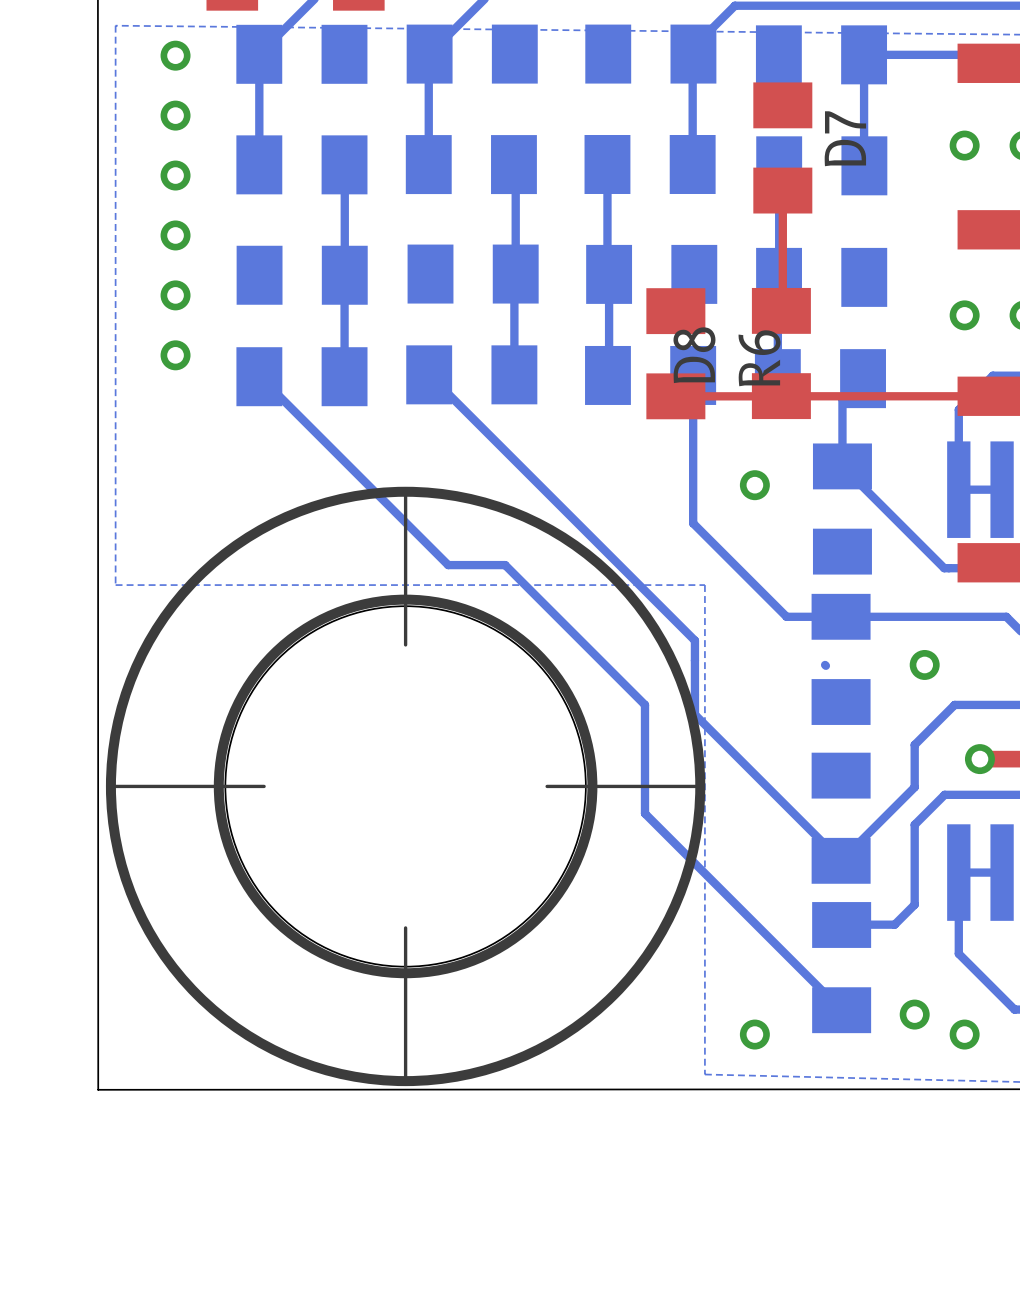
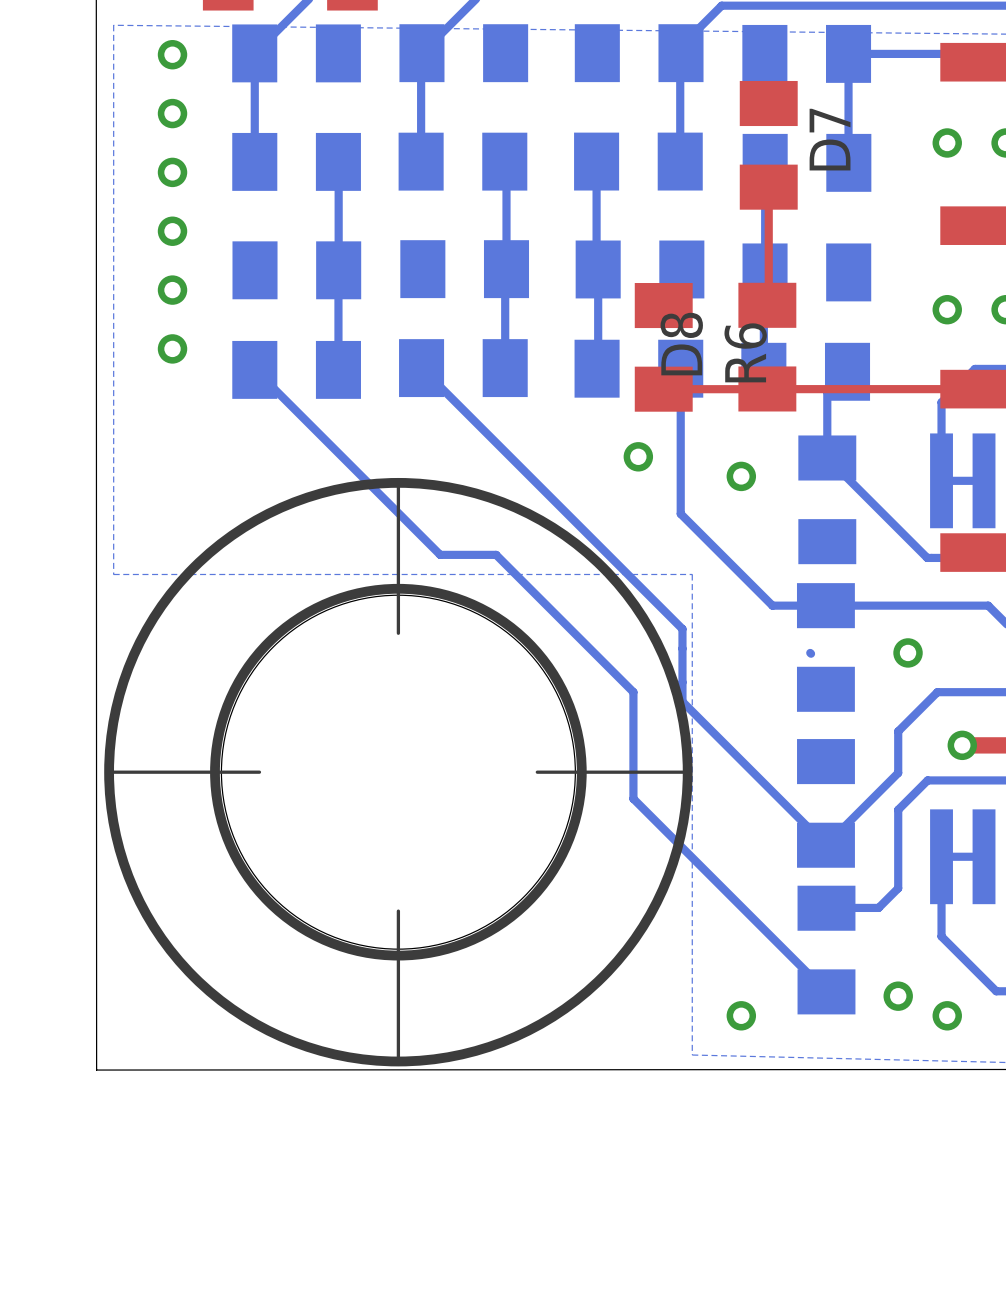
via: none -> (638, 456)

